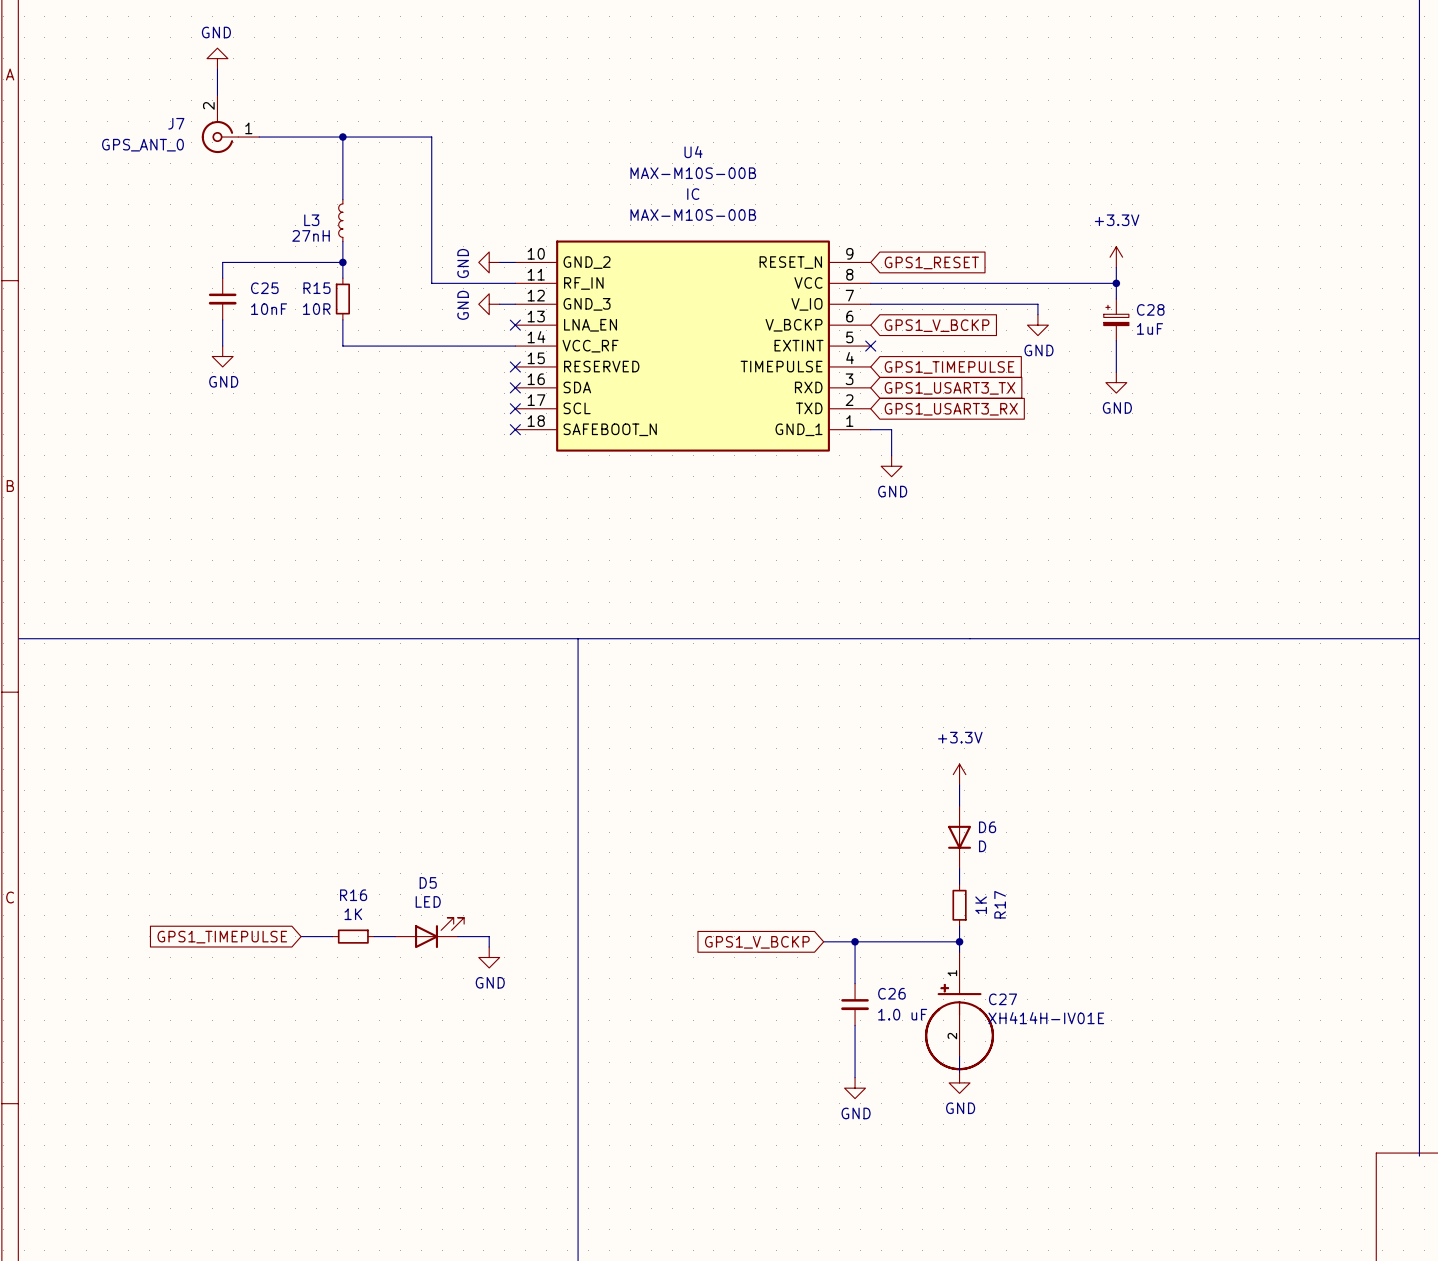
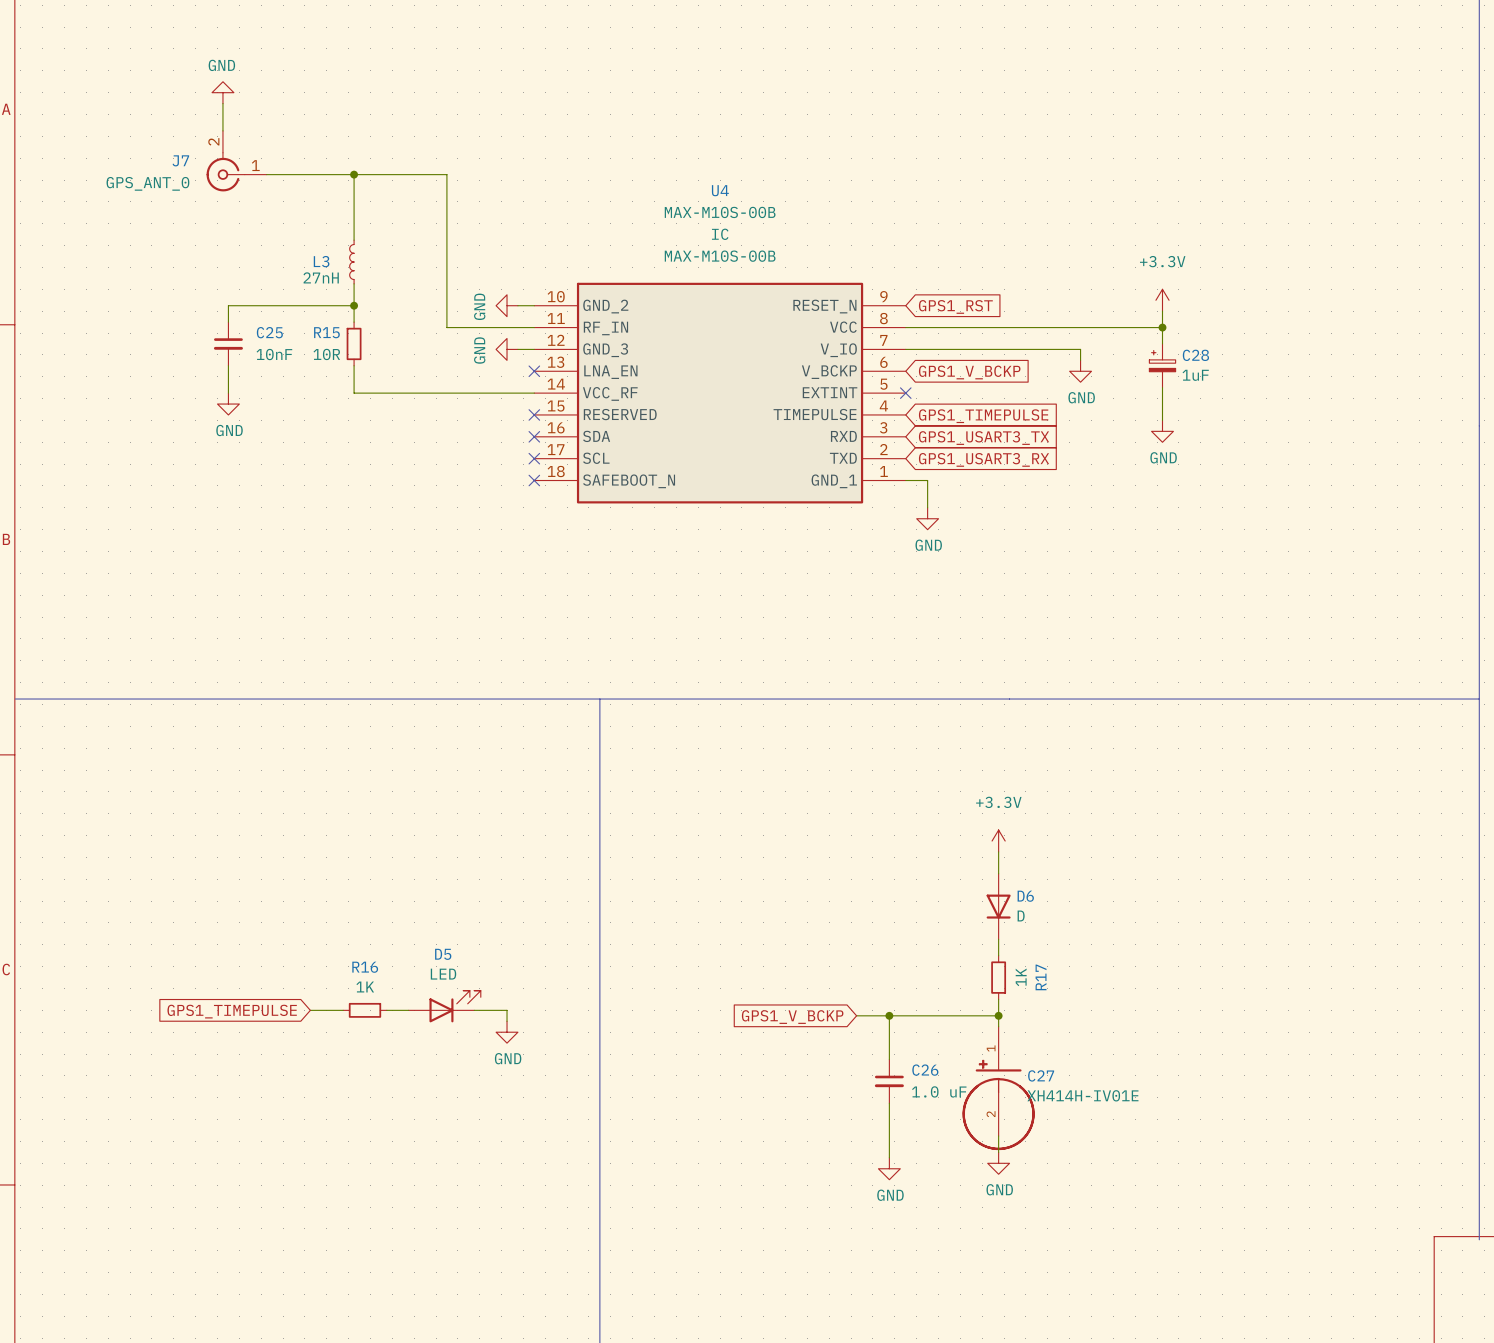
global label: GPS1_RESET (931, 262) -> GPS1_RST (955, 306)

